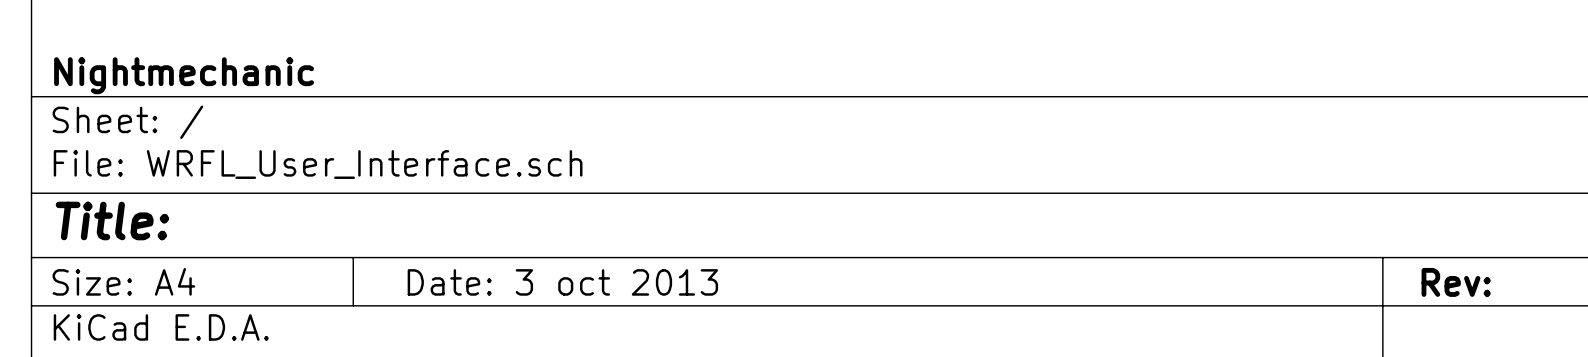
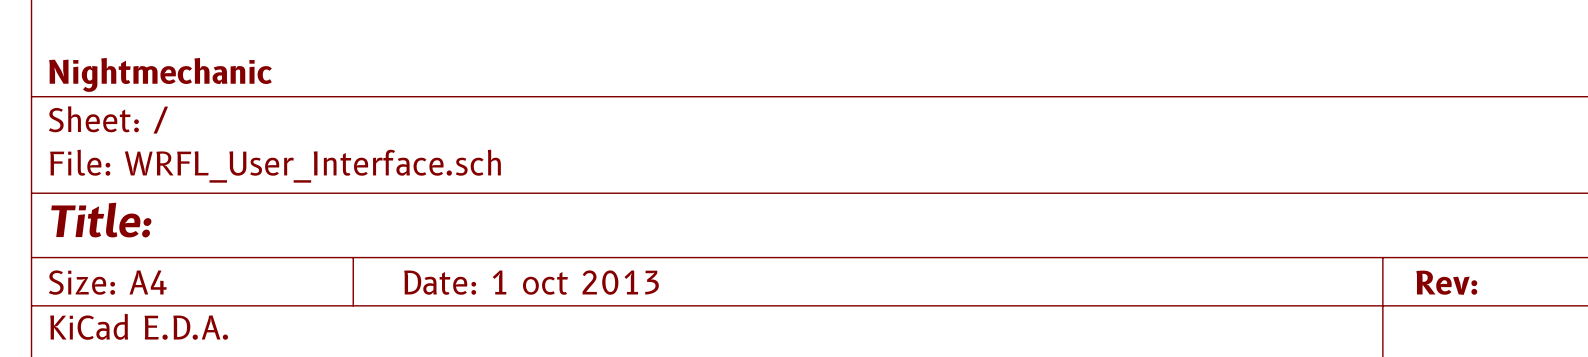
title block: Date: 3 oct 2013 (562, 282) -> Date: 1 oct 2013 (531, 282)

